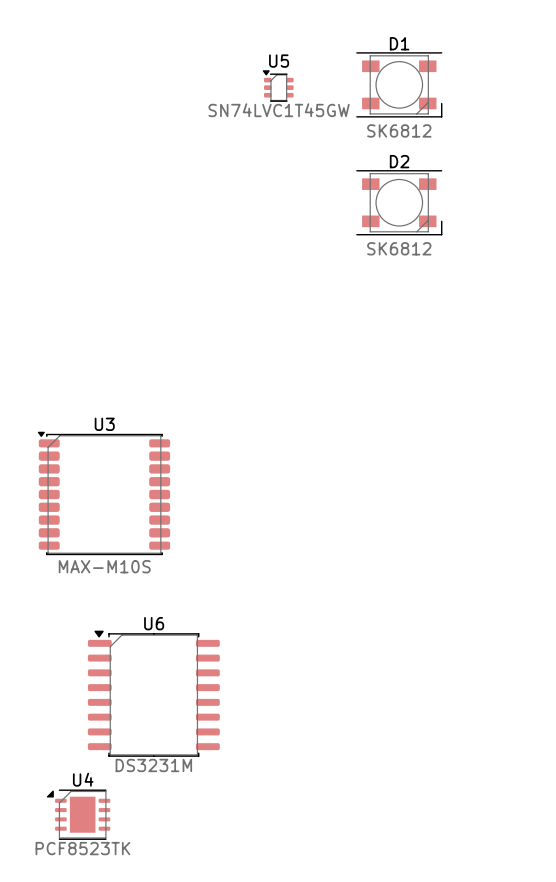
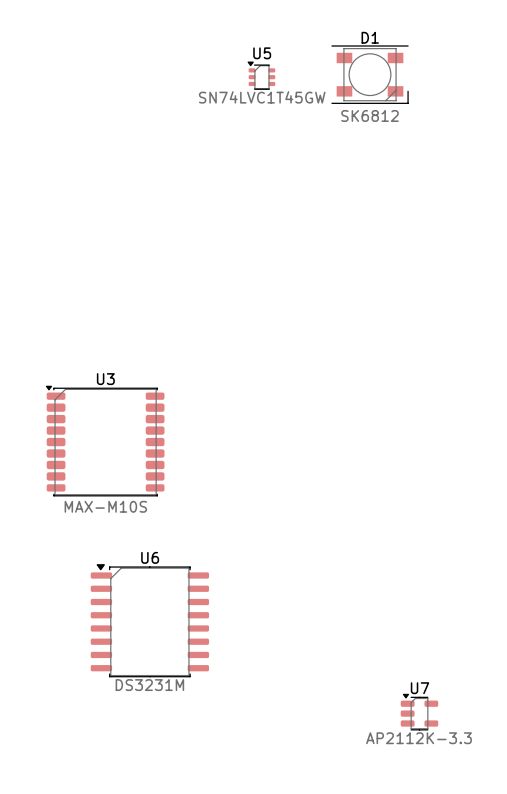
D2: SK6812 (399, 202) -> none
U7: none -> AP2112K-3.3 (419, 712)
U4: PCF8523TK (78, 814) -> none

